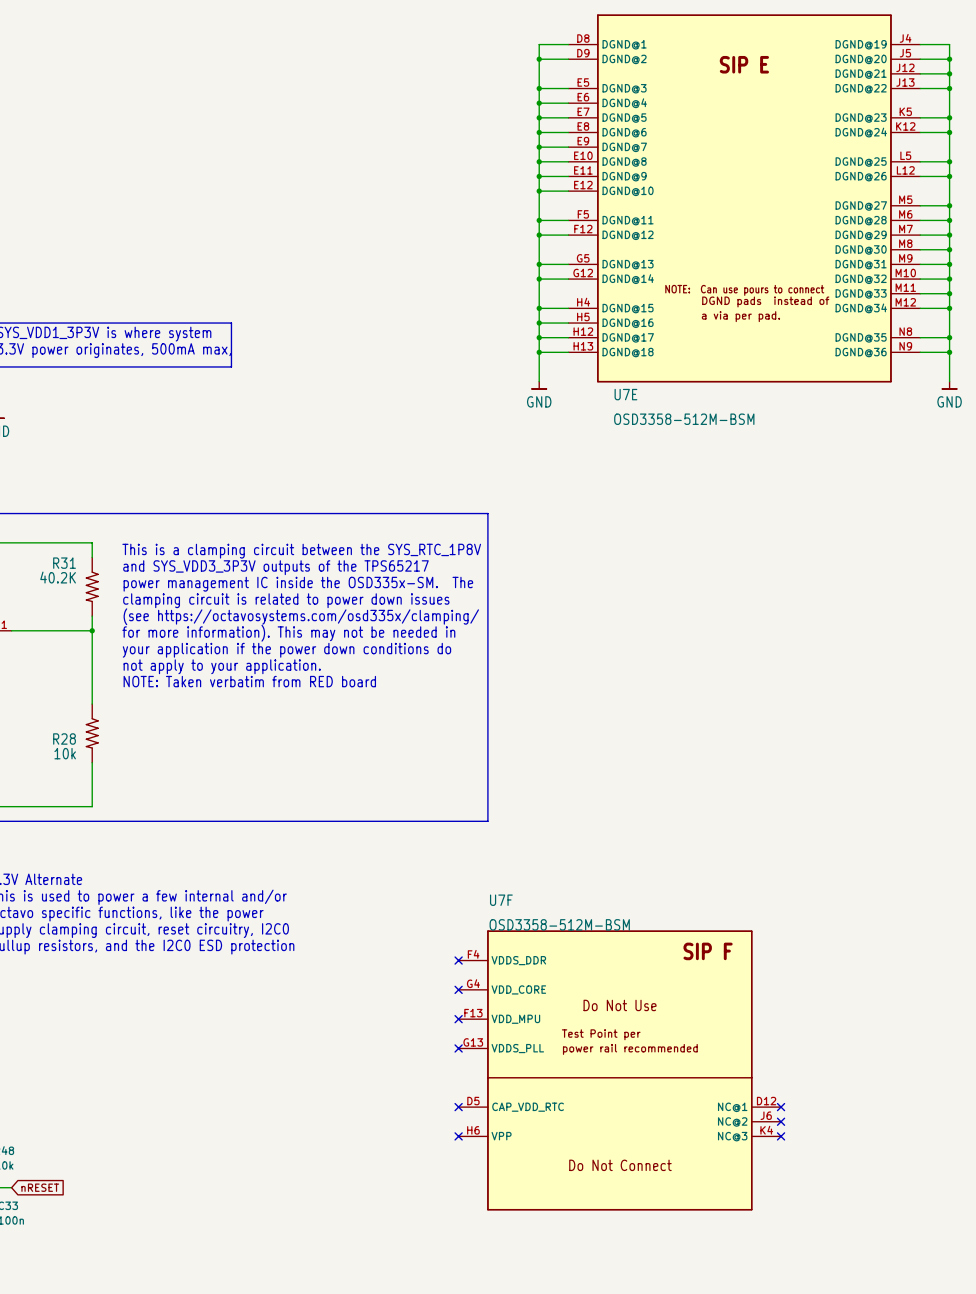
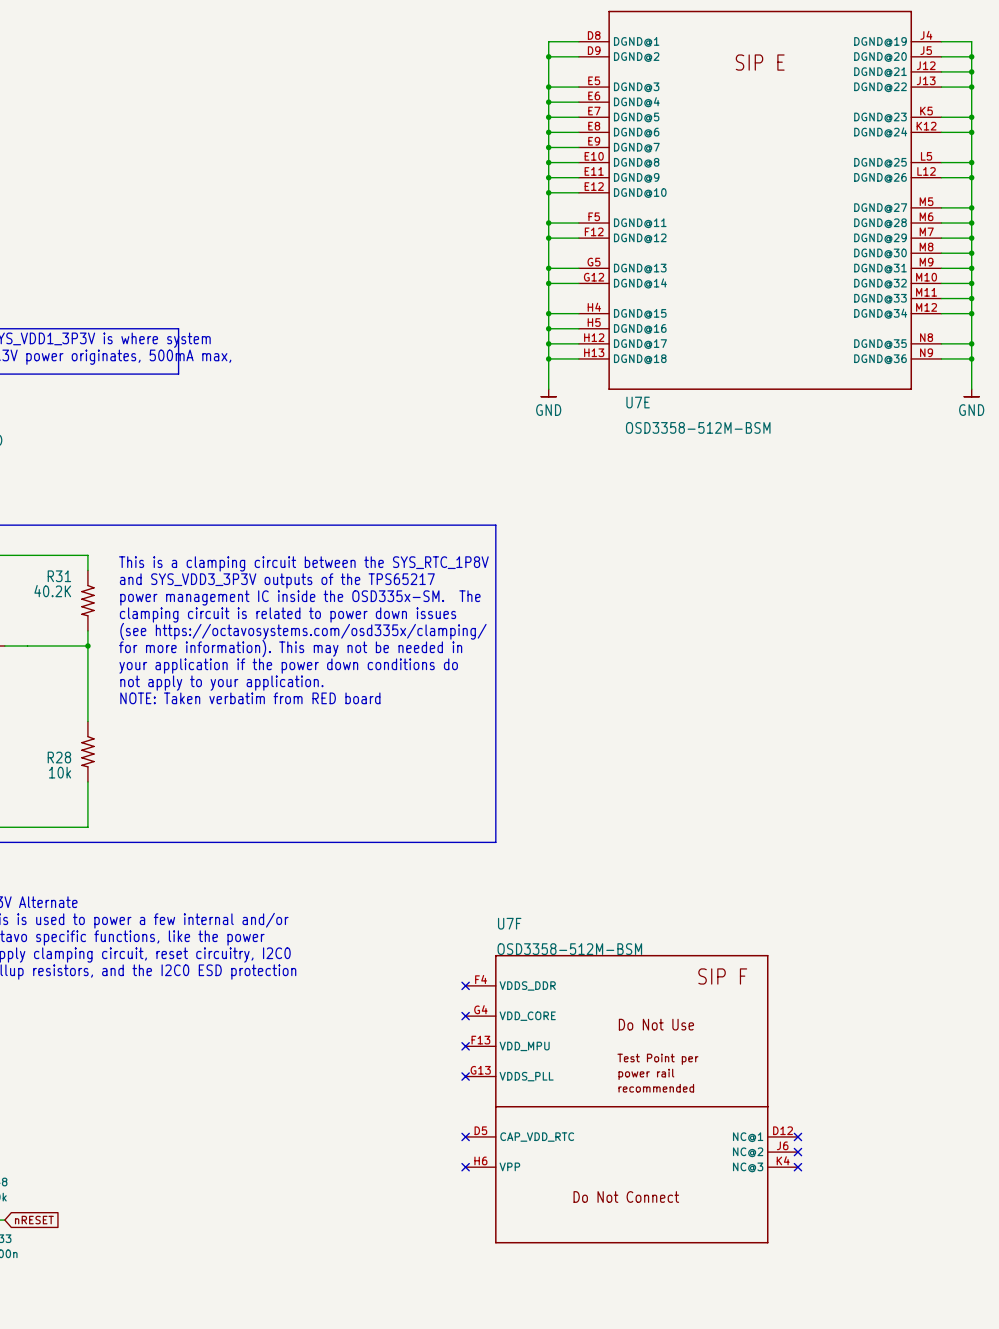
U7E symbol: [568, 14, 921, 383] -> [578, 10, 942, 390]
line: (180, 323) (231, 323) (231, 366) (180, 366) -> (178, 328) (178, 374)
U7F symbol: [458, 930, 782, 1211] -> [465, 954, 798, 1244]

